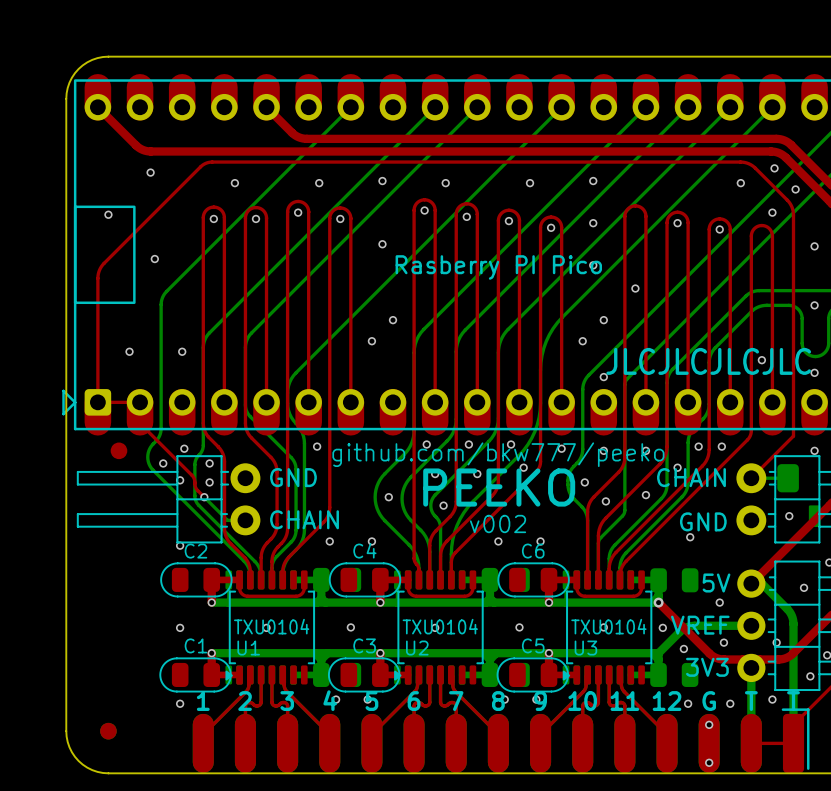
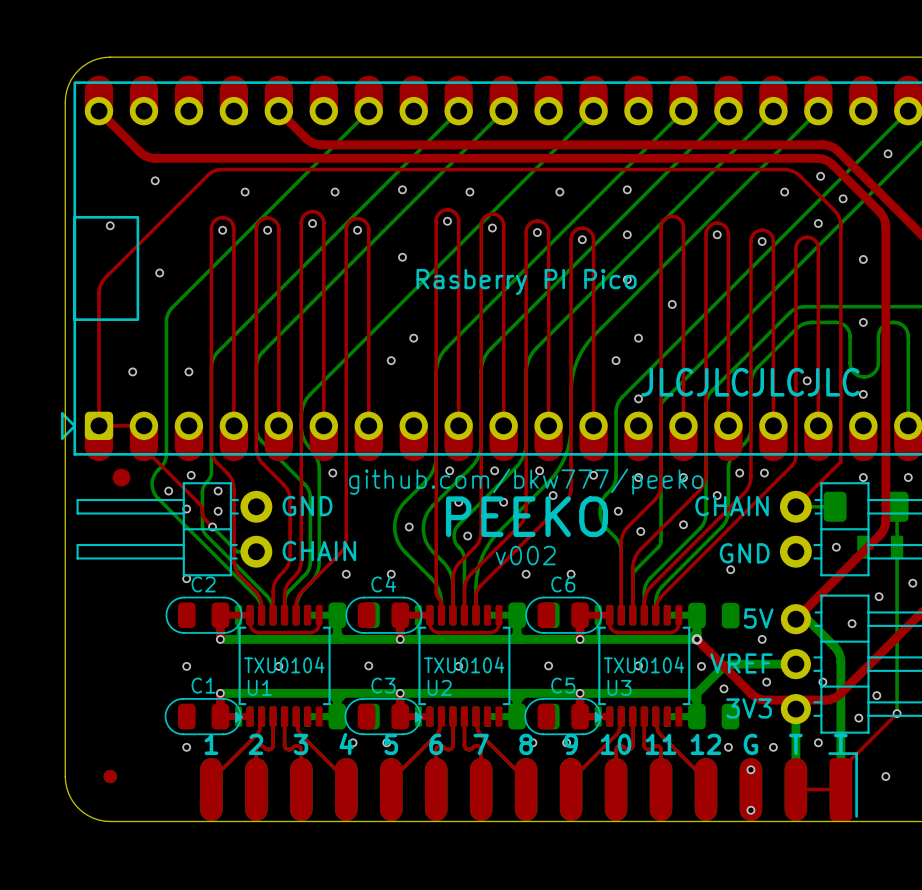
part: (108, 731) -> none
part: none -> (110, 776)

